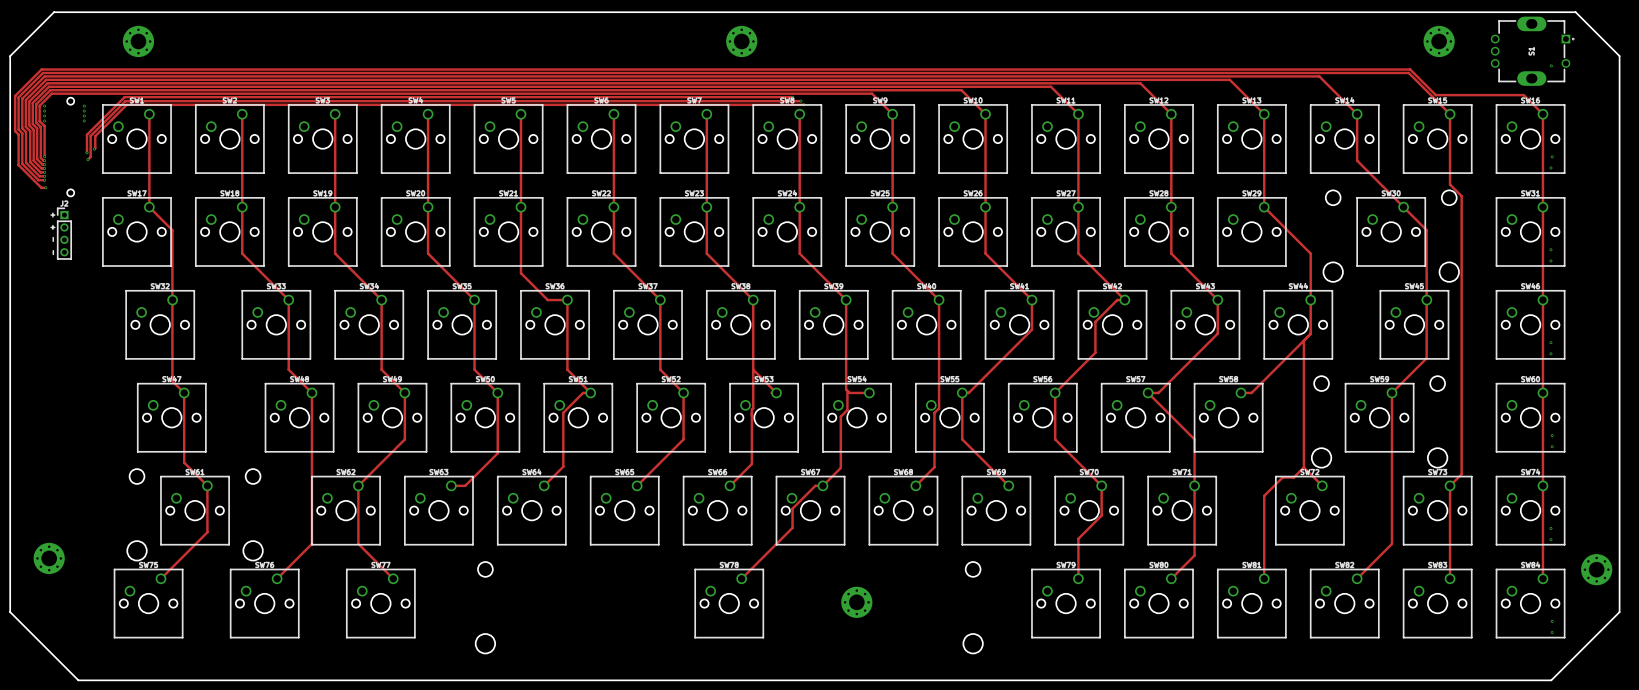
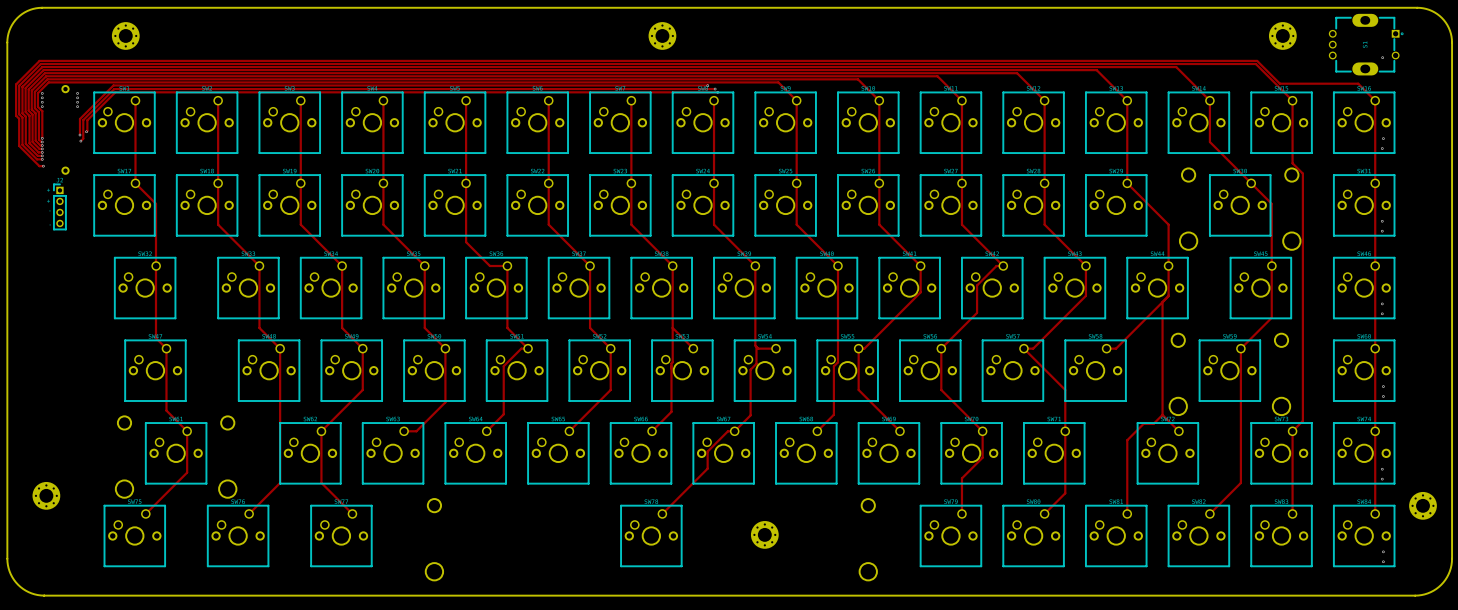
board edge: none -> (42, 7) (27, 11) (17, 17) (10, 27) (7, 39) (7, 558) (10, 574) (18, 584) (31, 593) (44, 595)
board edge: none -> (42, 7) (1417, 7) (1432, 11) (1441, 17) (1449, 30) (1452, 42) (1451, 561) (1445, 579) (1438, 587) (1427, 593) (1415, 595) (44, 595)
board edge: (54, 12) (10, 56) (10, 612) (78, 680) (1551, 680) (1619, 612) (1619, 56) (1575, 12) (54, 12) -> none

